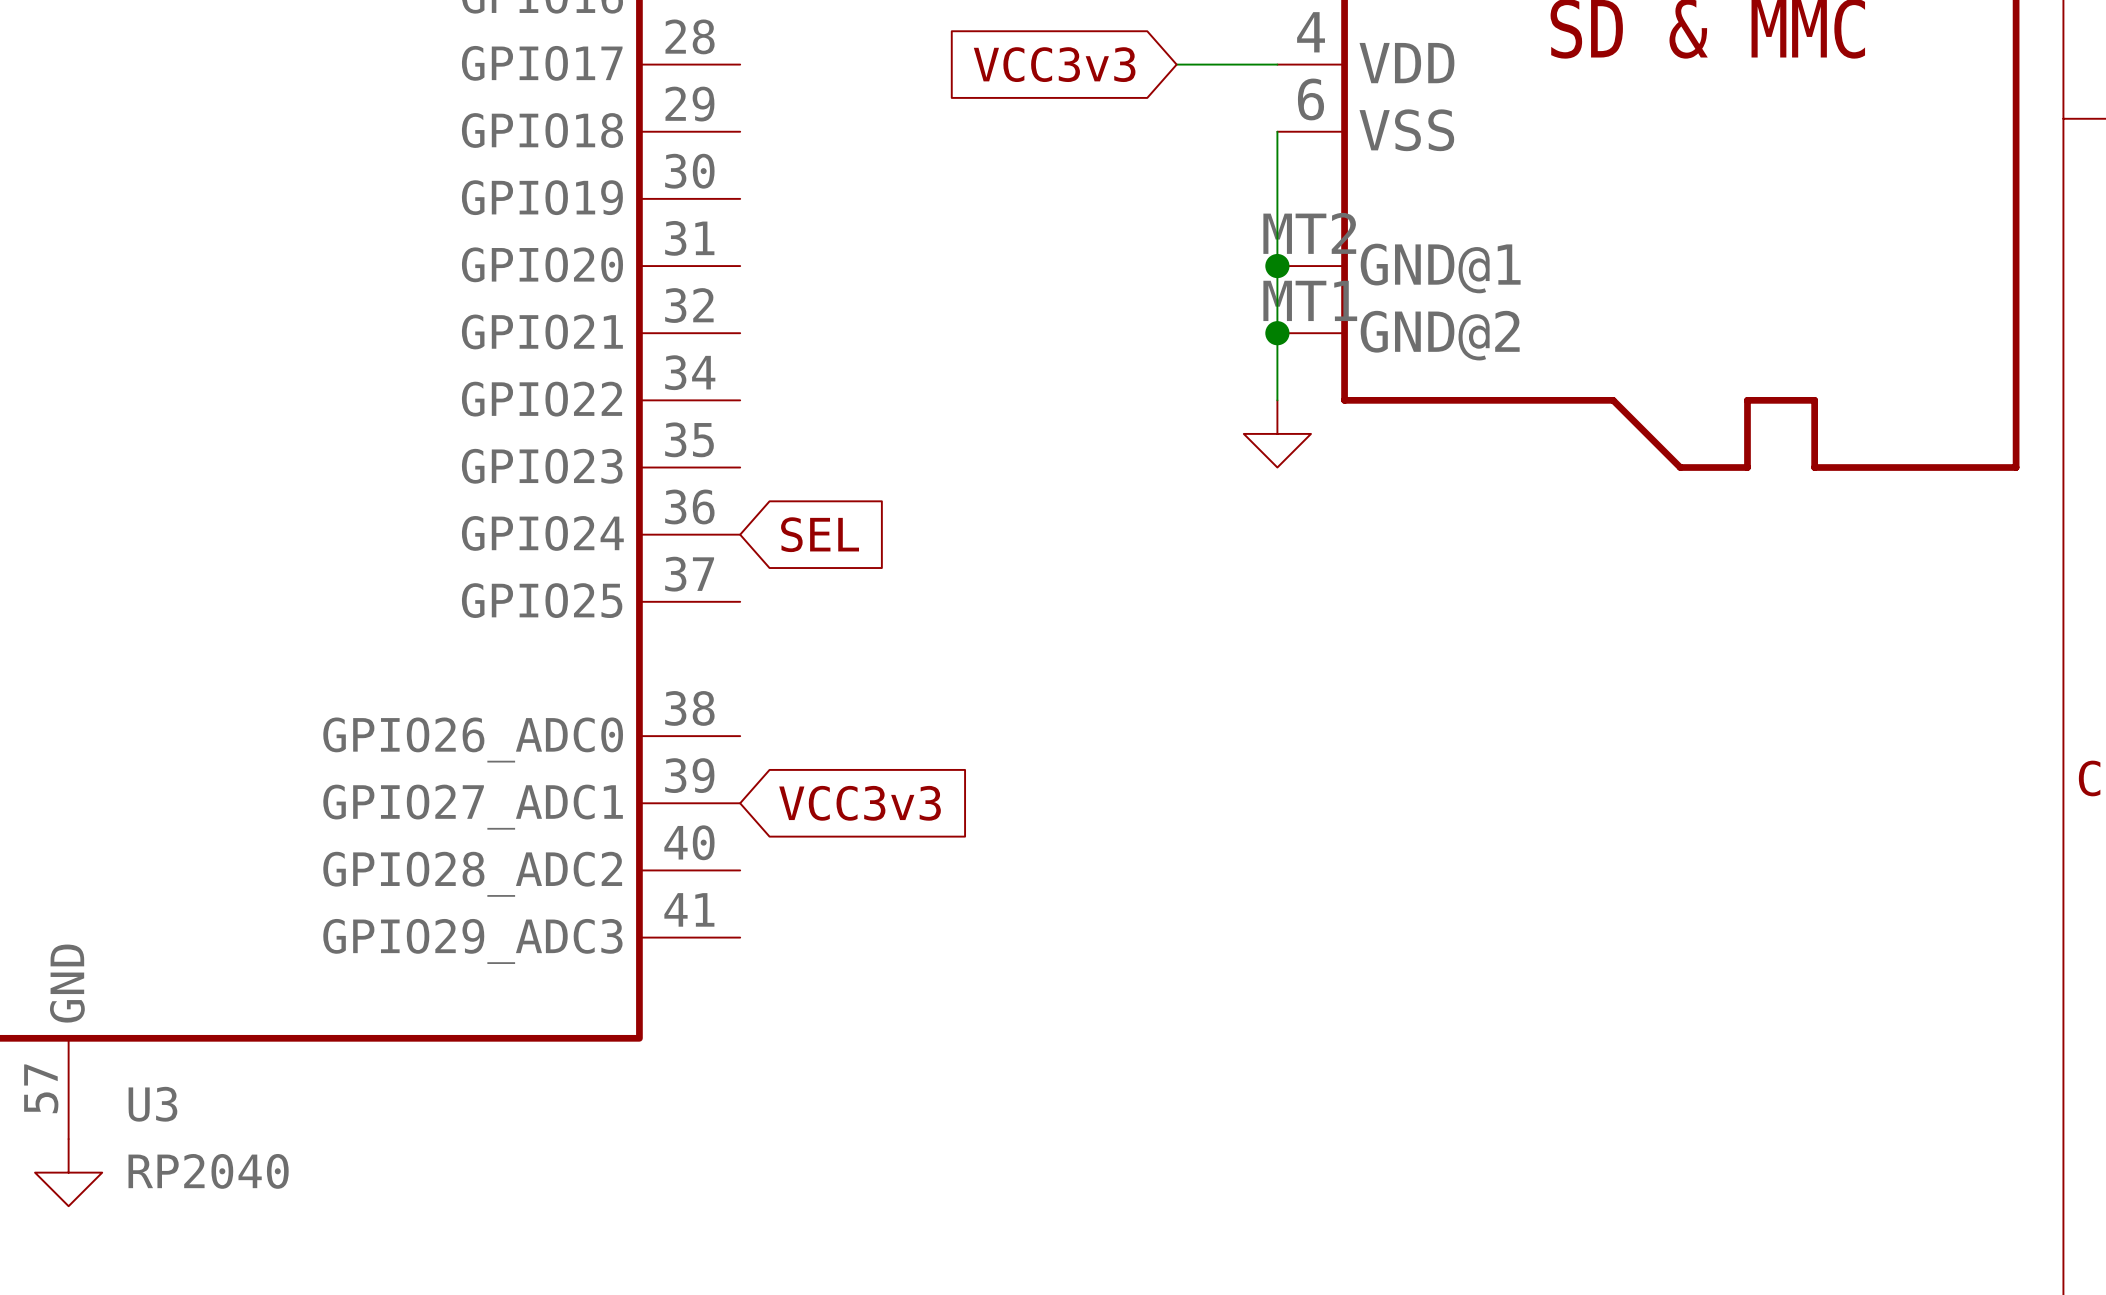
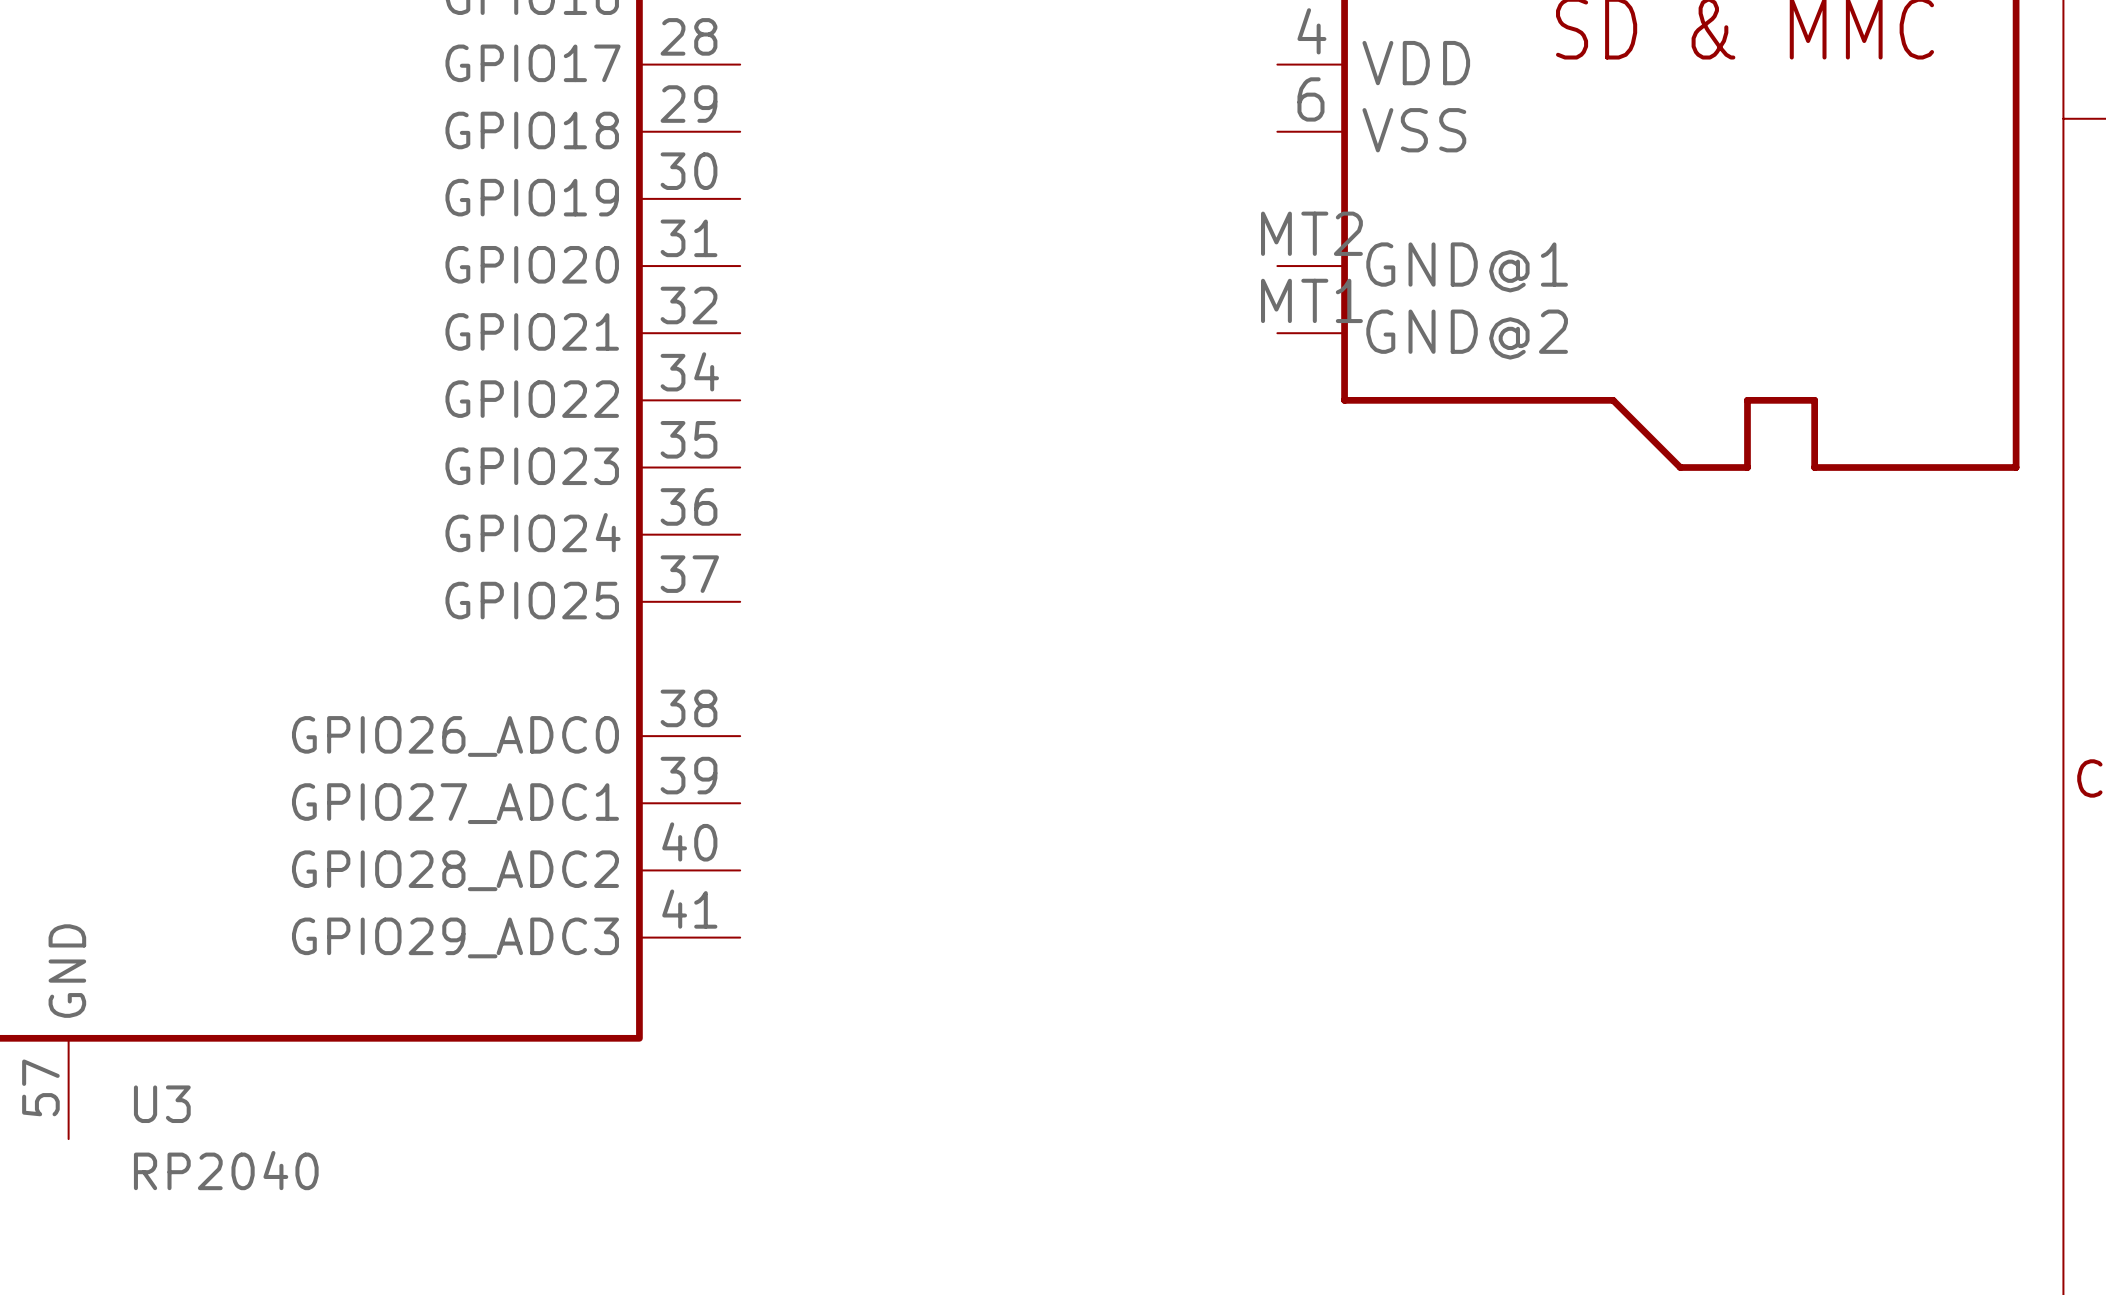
global label: VCC3v3 (1054, 64) -> none
wire: (1176, 64) (1277, 64) -> none
wire: (1277, 131) (1277, 400) -> none
junction: (1277, 266) -> none
junction: (1277, 333) -> none
power symbol: (1277, 433) -> none
global label: SEL (820, 534) -> none
global label: VCC3v3 (860, 803) -> none
power symbol: (68, 1172) -> none

